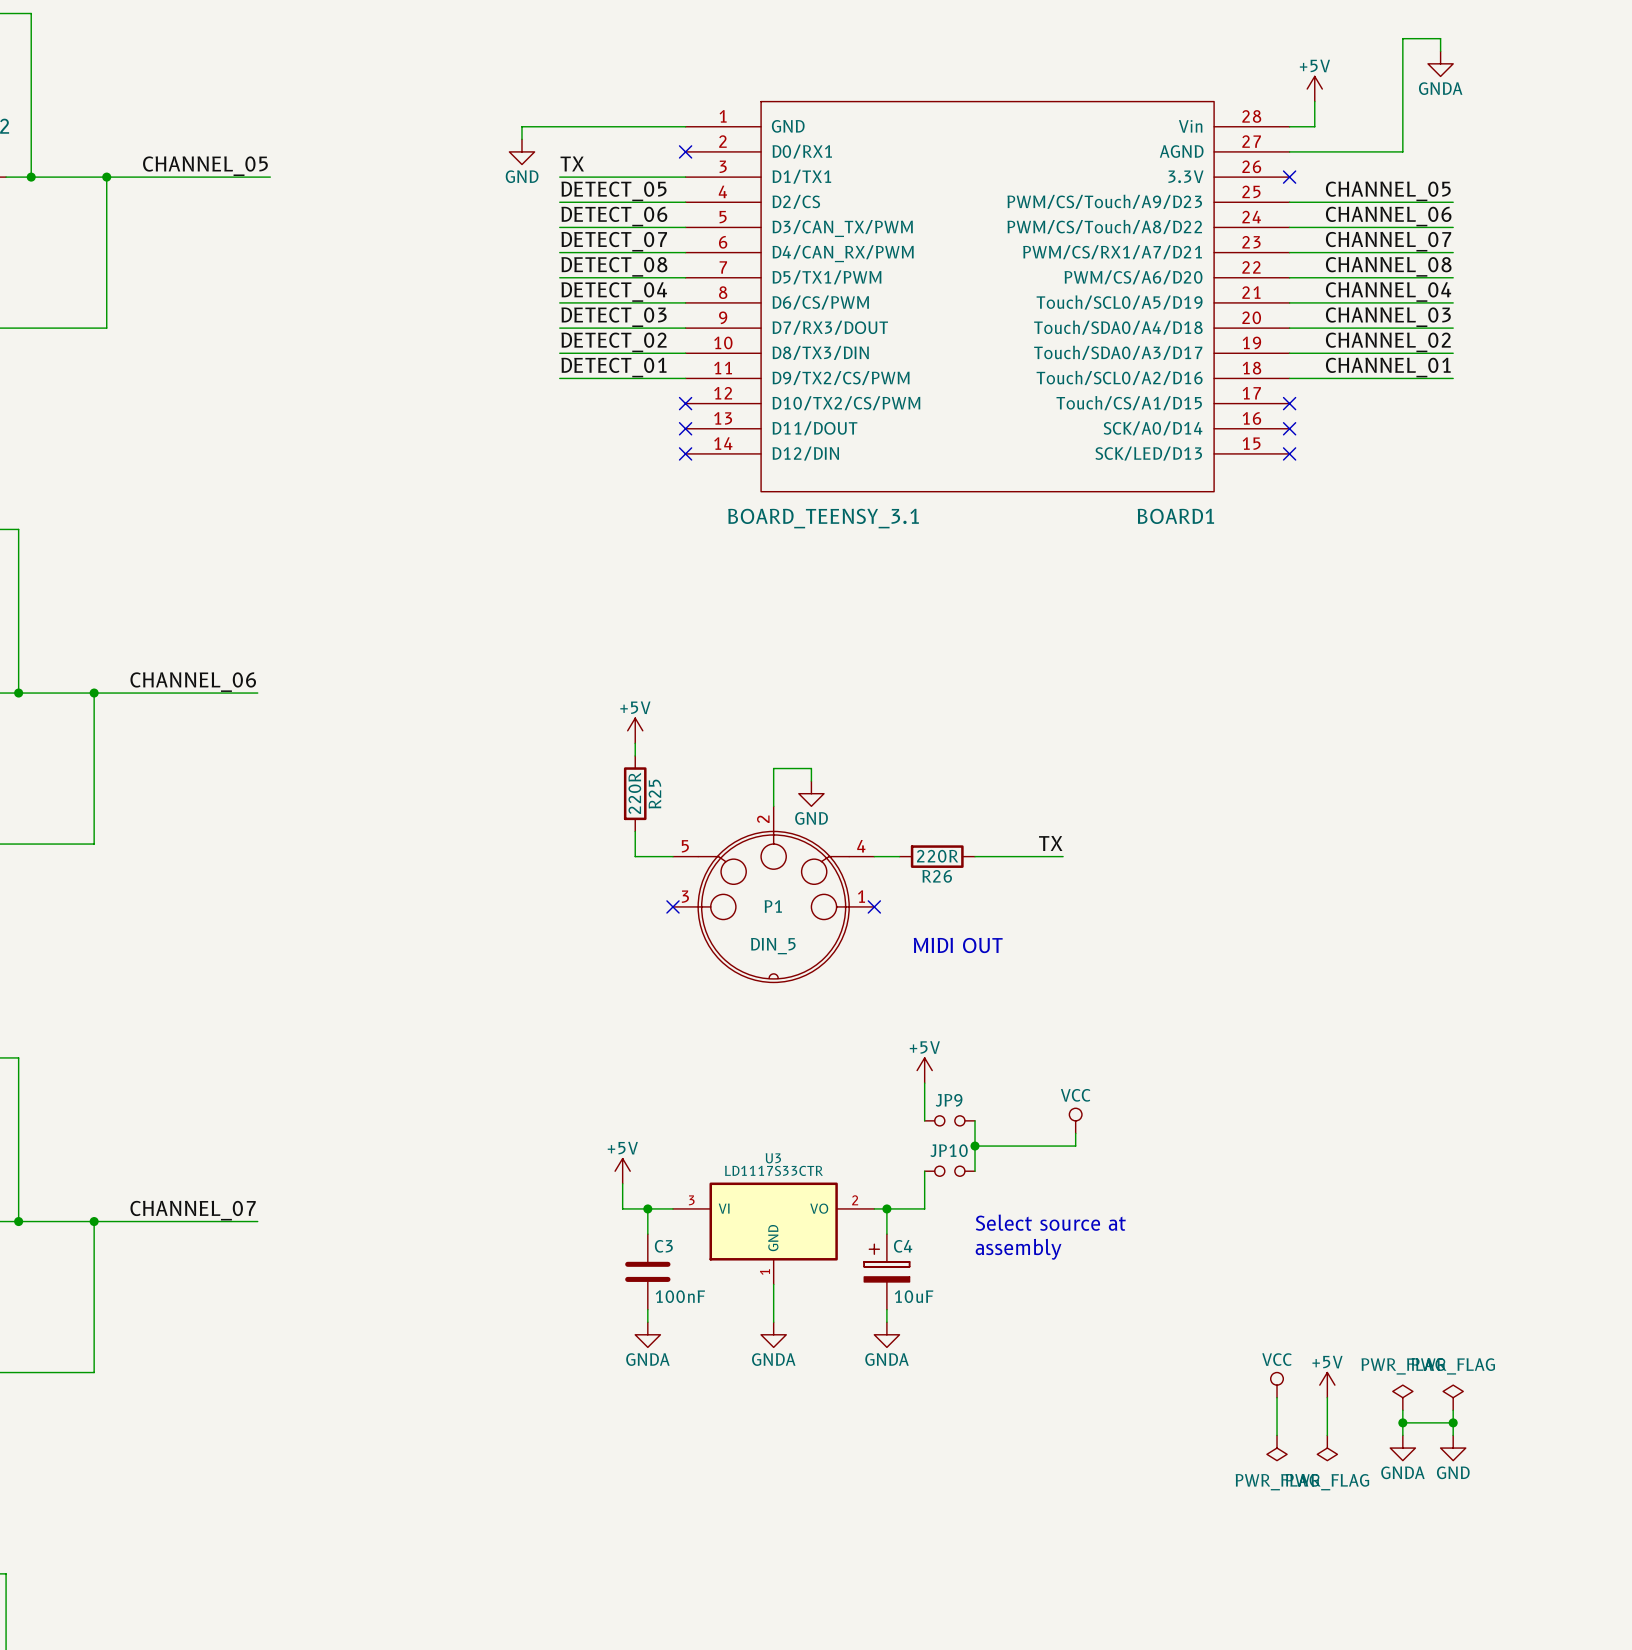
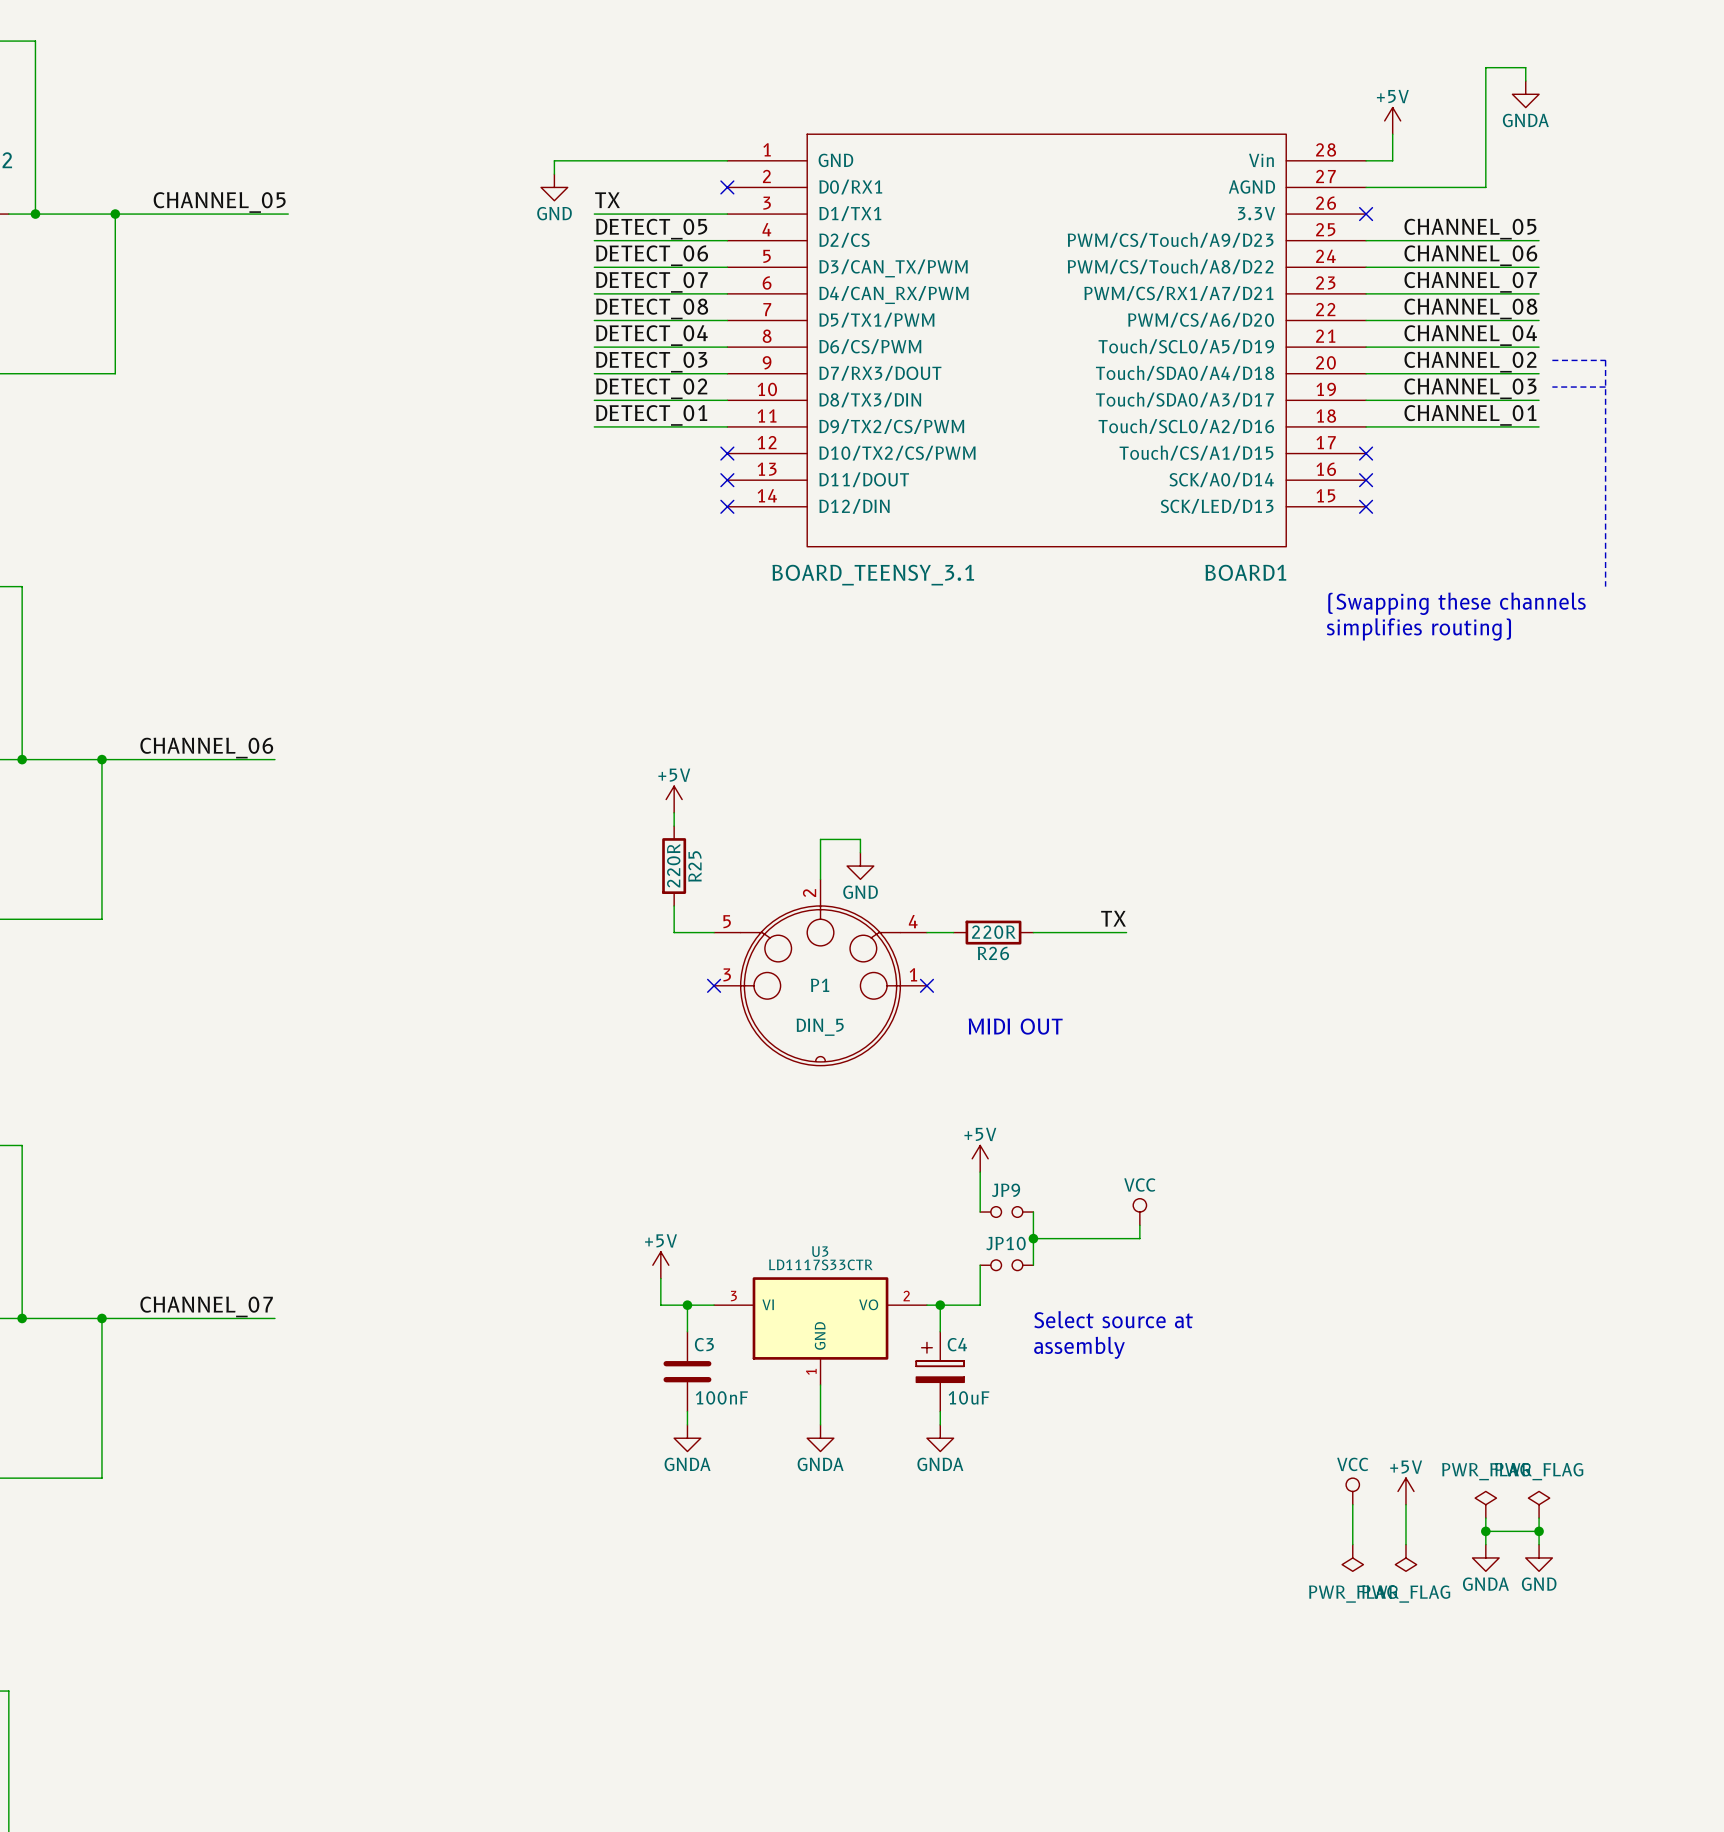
line: none -> (1552, 360) (1605, 360) (1605, 586)
label: CHANNEL_03 (1388, 317) -> CHANNEL_02 (1470, 362)
line: none -> (1552, 387) (1605, 387)
label: CHANNEL_02 (1388, 342) -> CHANNEL_03 (1470, 388)
text: none -> (Swapping these channels (1456, 603)
text: none -> simplifies routing) (1418, 629)

